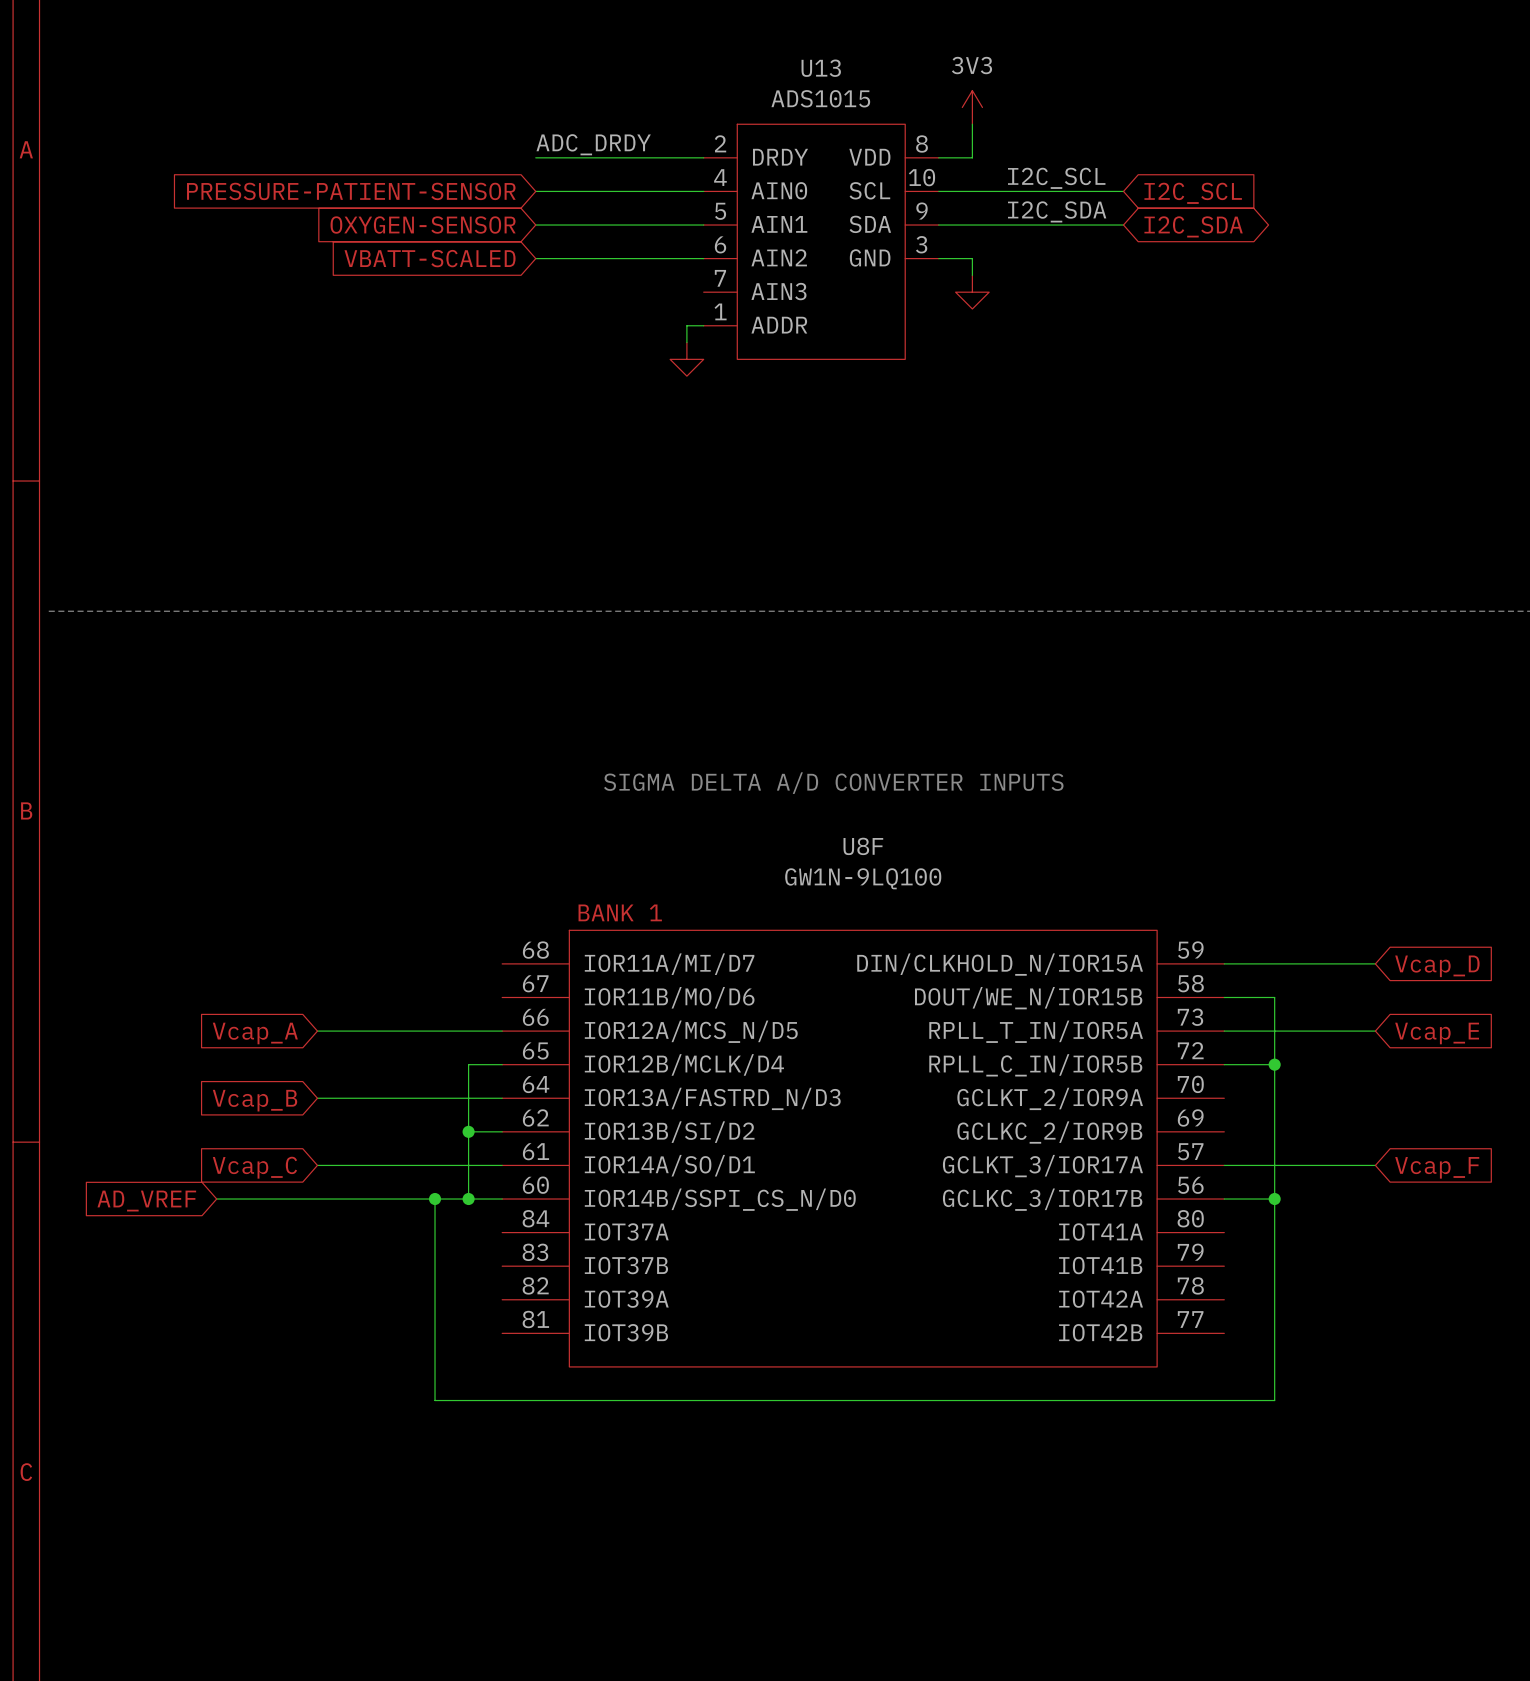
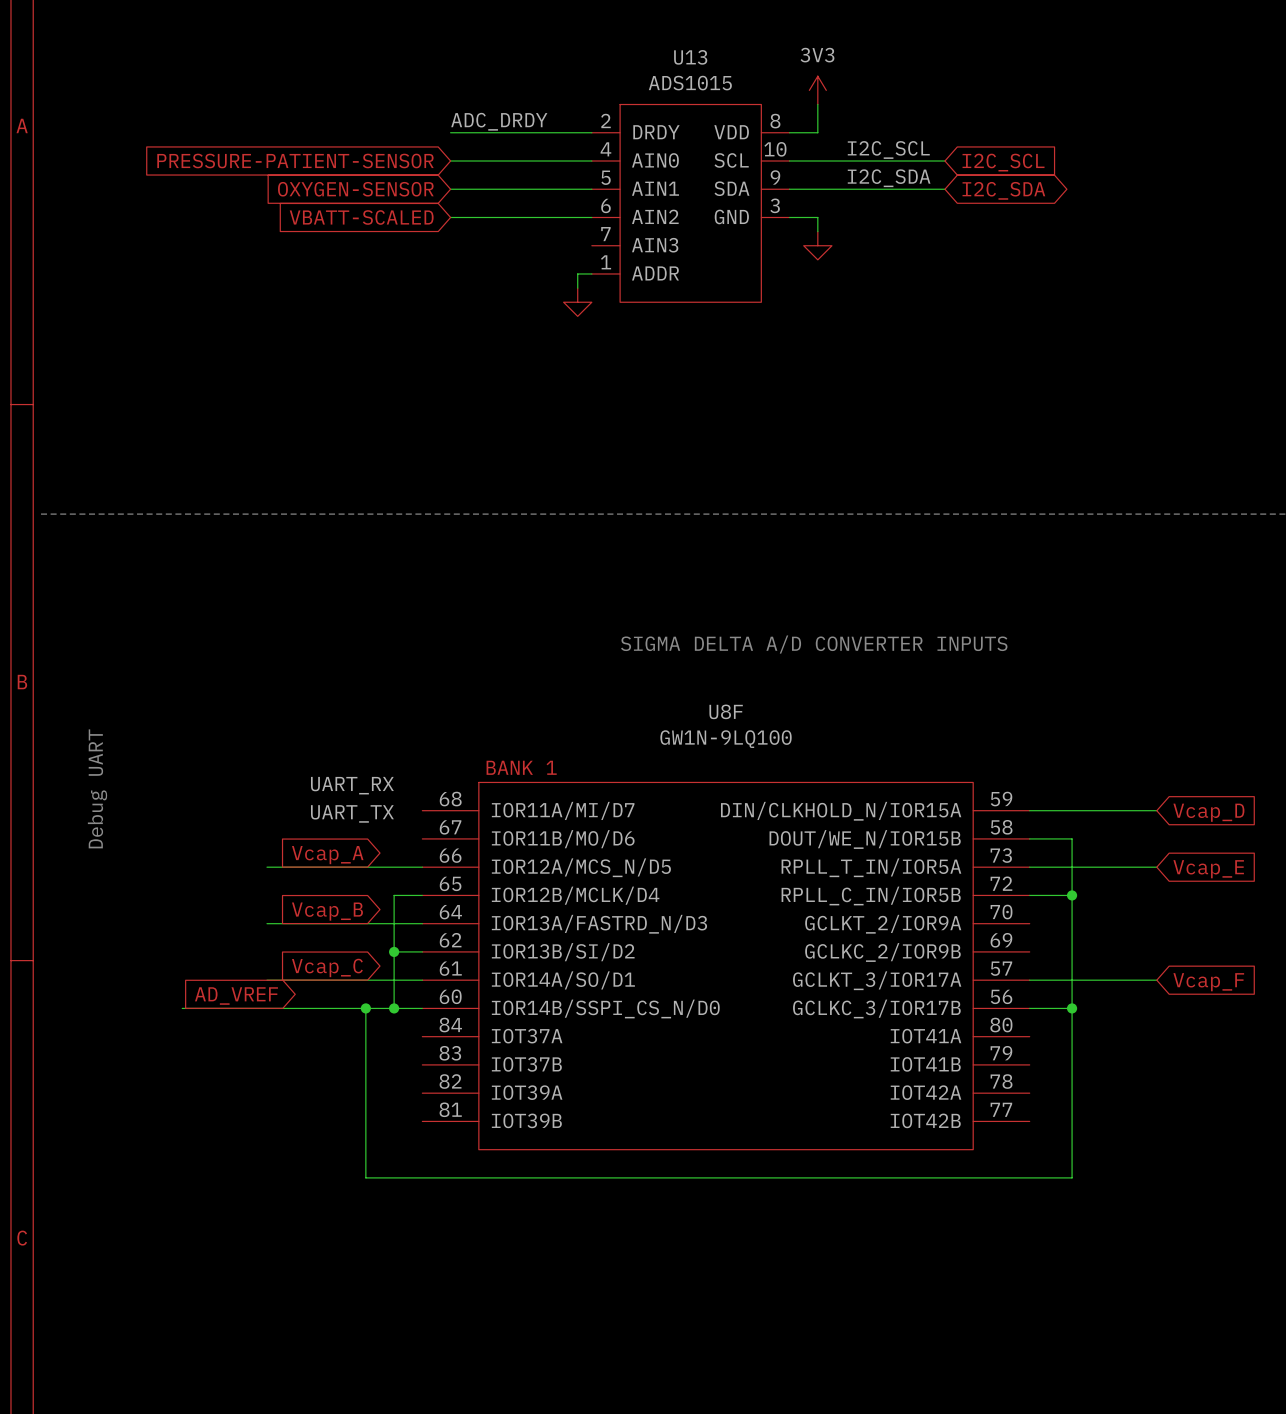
text position: SIGMA DELTA A/D CONVERTER INPUTS (833, 783) -> SIGMA DELTA A/D CONVERTER INPUTS (814, 644)
label: none -> UART_RX (352, 785)
text: none -> Debug UART (97, 788)
label: none -> UART_TX (352, 813)
global label position: Vcap_A (255, 1033) -> Vcap_A (327, 855)
global label position: Vcap_B (255, 1100) -> Vcap_B (327, 911)
global label position: Vcap_C (254, 1167) -> Vcap_C (327, 967)
global label position: AD_VREF (146, 1201) -> AD_VREF (236, 996)

